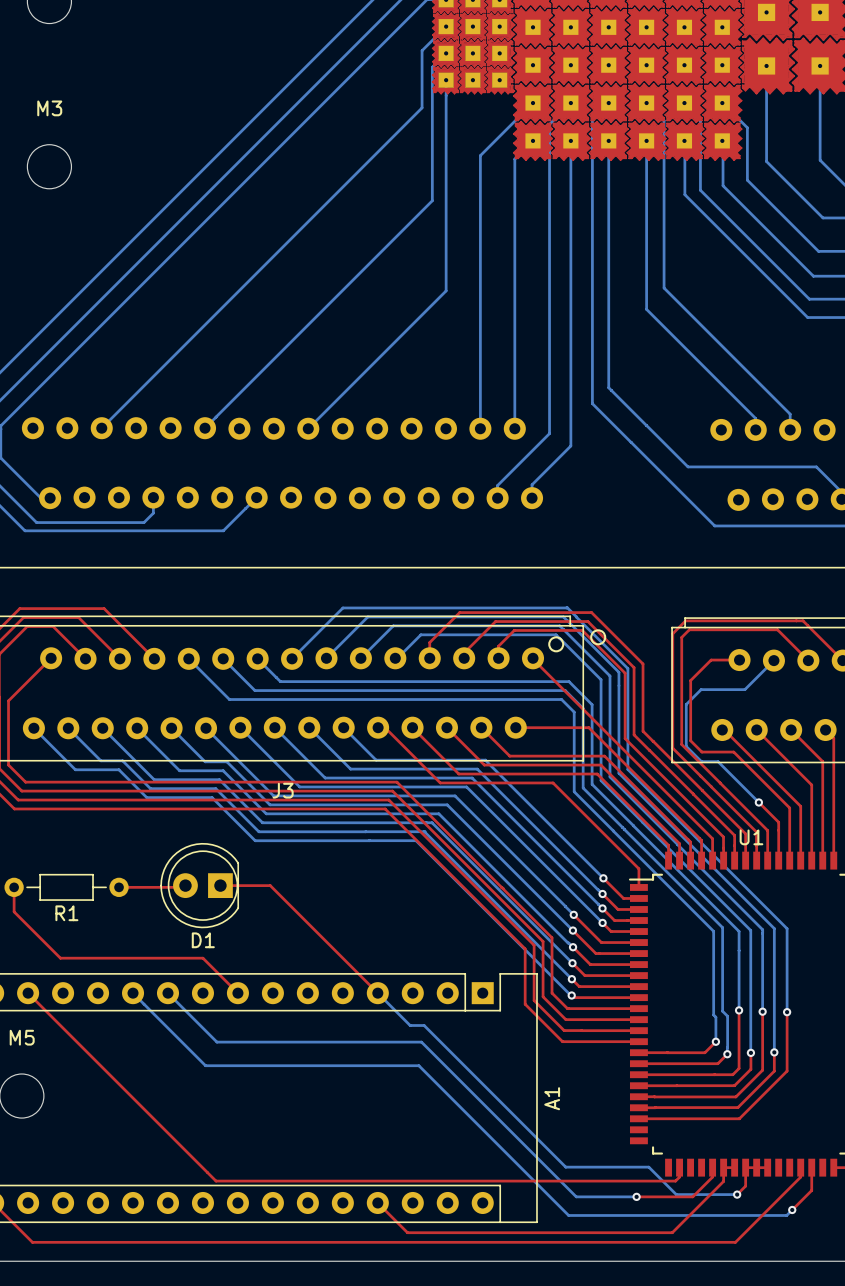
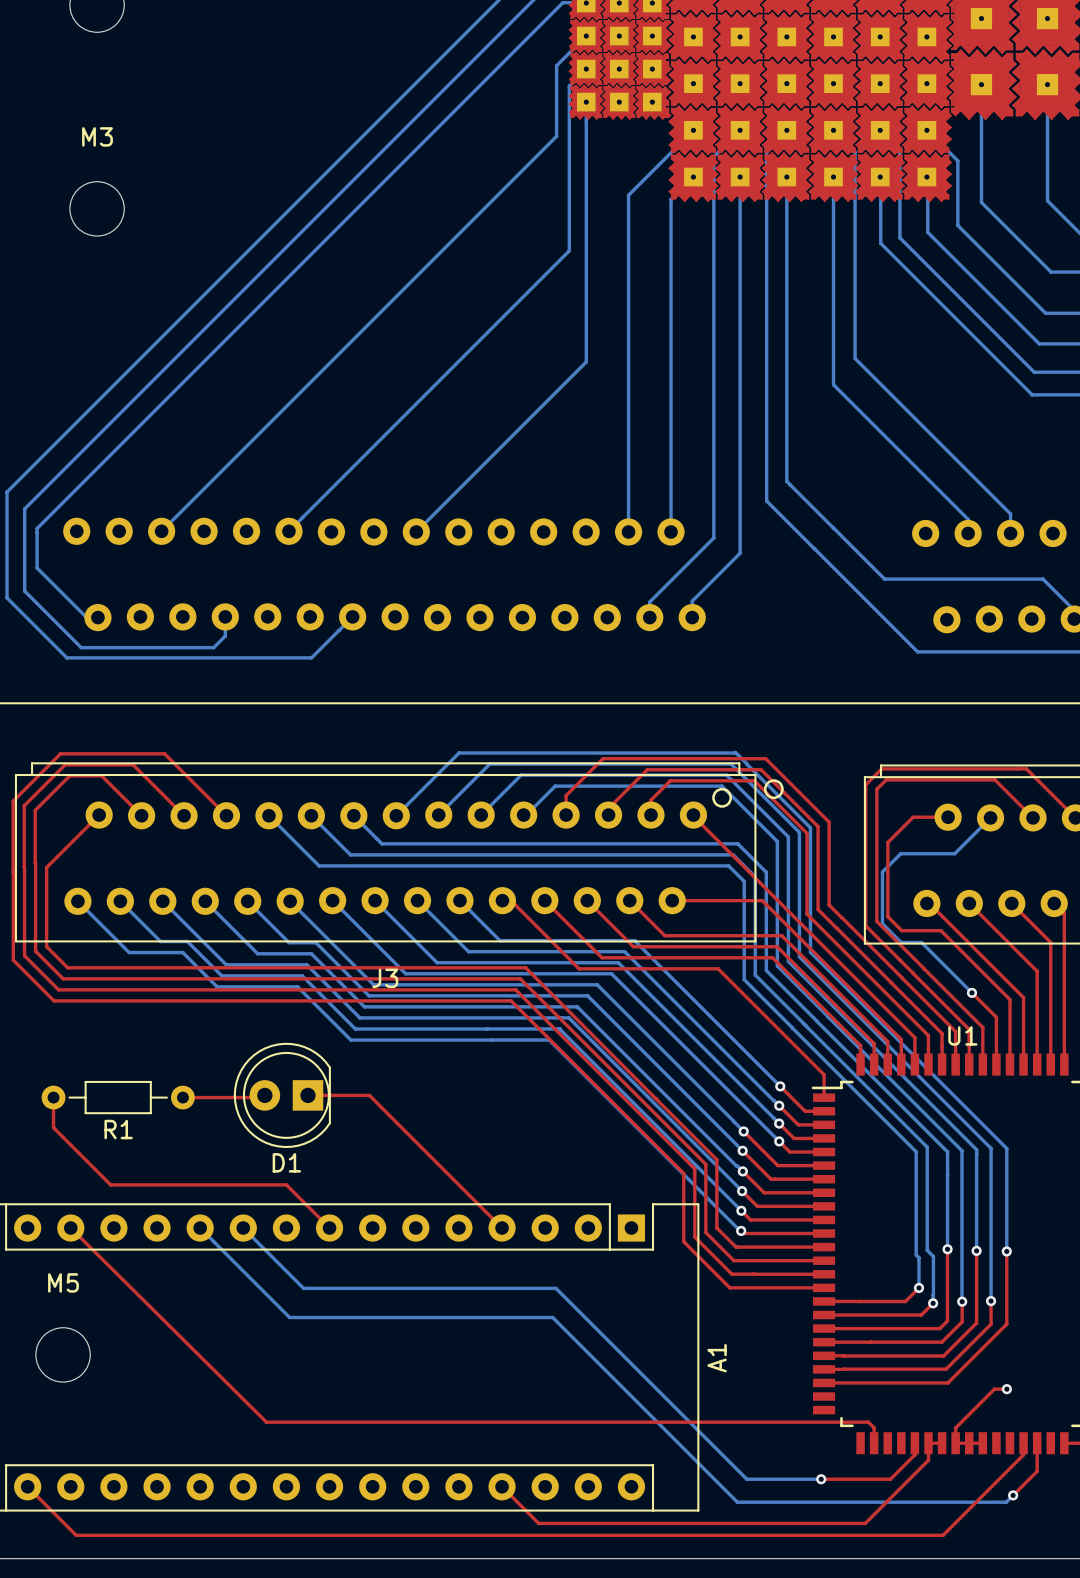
top track: (28, 993) (216, 1181) (675, 1181) (679, 1177) (679, 1167) -> (70, 1228) (266, 1422) (868, 1422) (874, 1427) (874, 1443)
bottom track: (377, 993) (410, 1025) (424, 1025) (565, 1167) (648, 1167) (676, 1194) (737, 1194) -> none
via: none -> (1006, 1389)
top track: (745, 1167) (745, 1186) (737, 1194) -> (955, 1443) (955, 1427) (994, 1389) (1006, 1389)
via: (737, 1194) -> none

